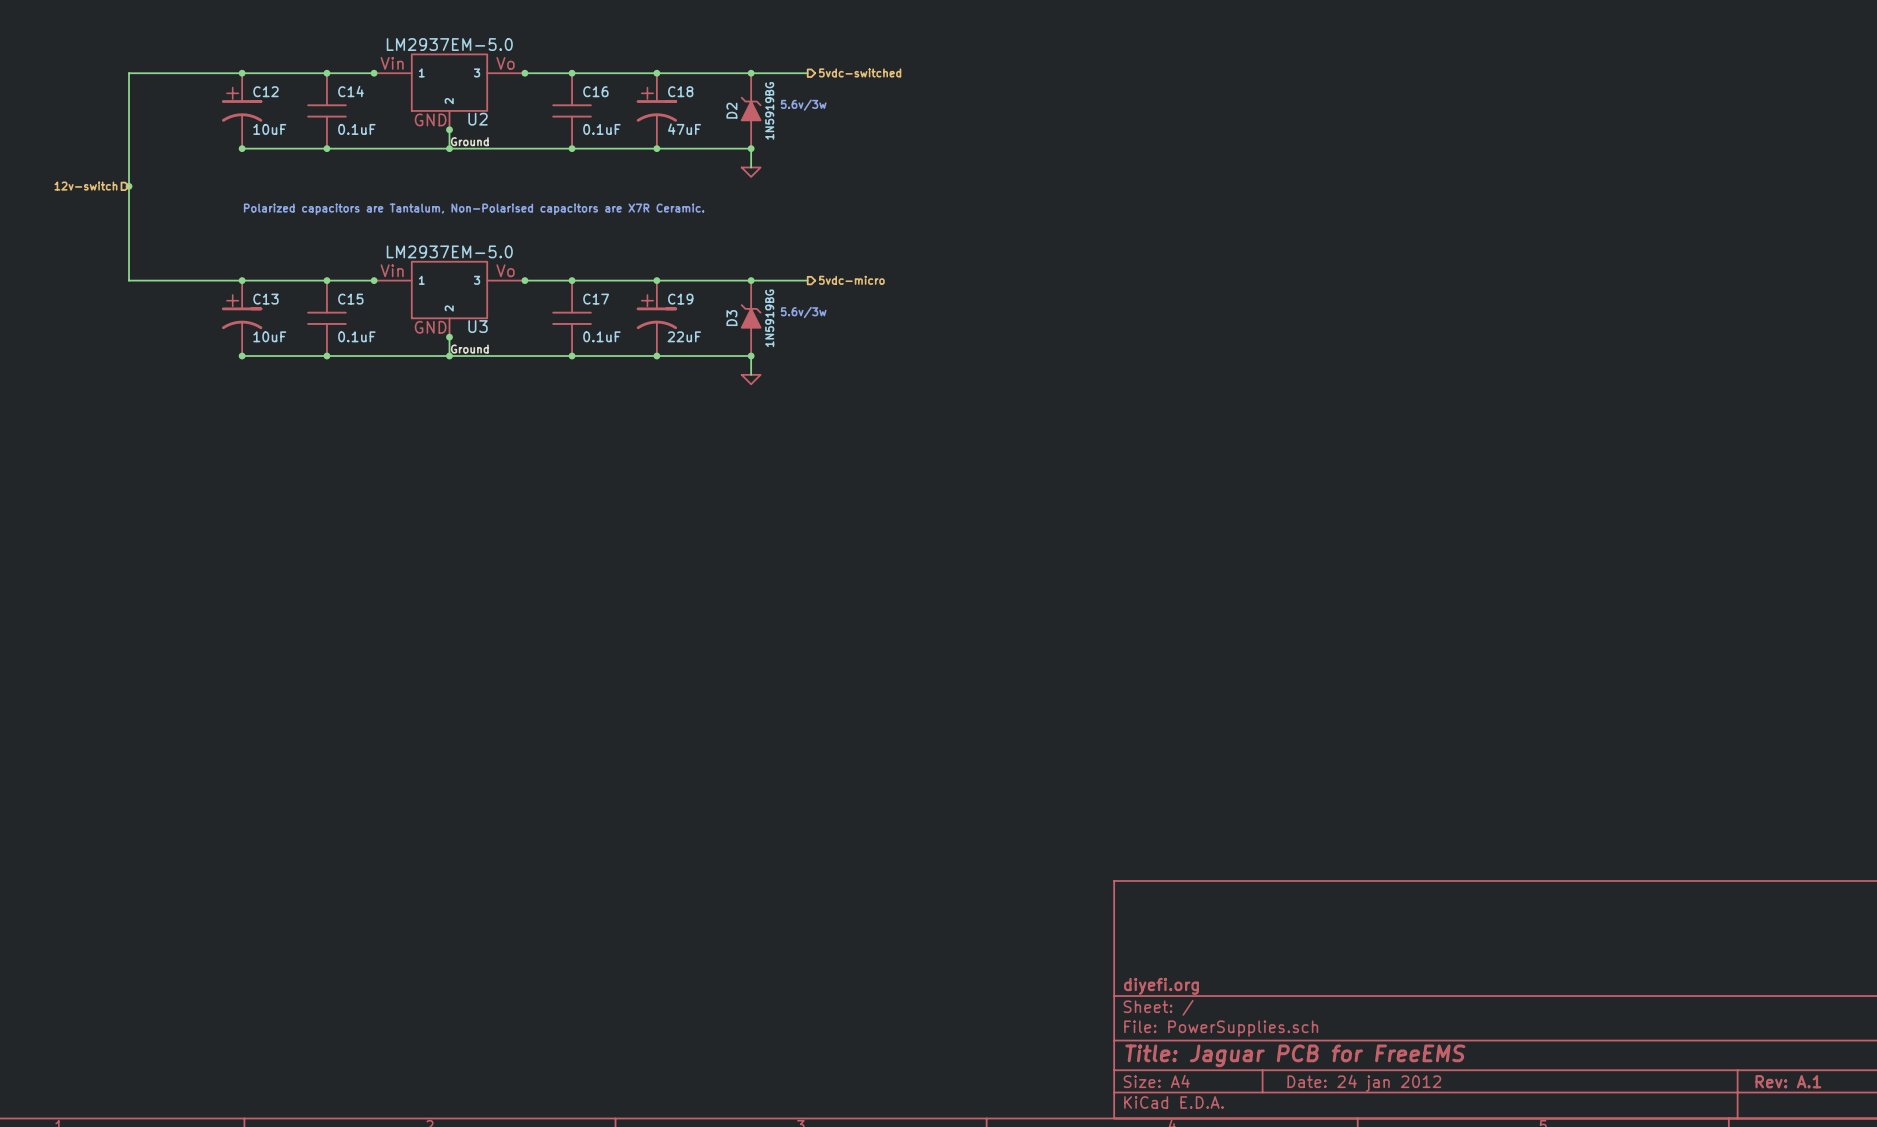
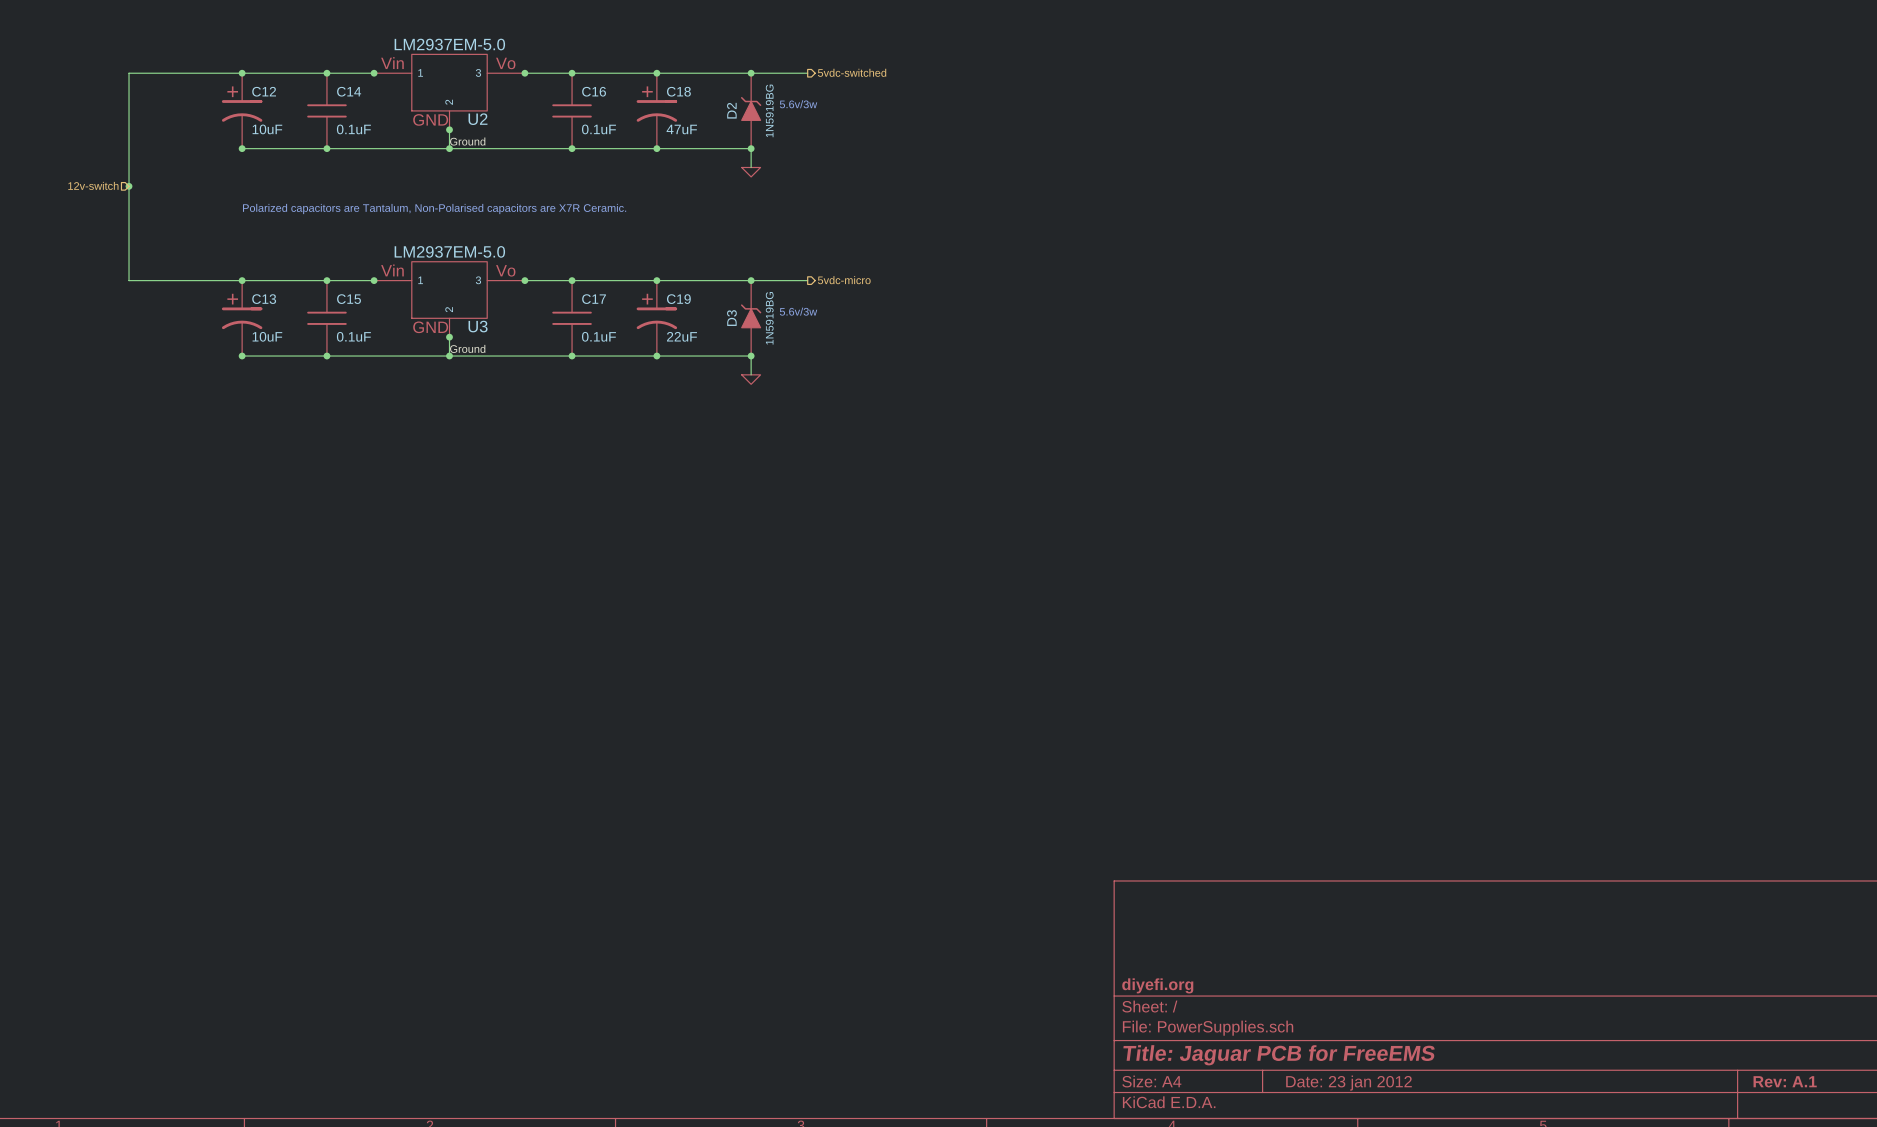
title block: Date: 24 jan 2012 (1364, 1083) -> Date: 23 jan 2012 (1349, 1083)

